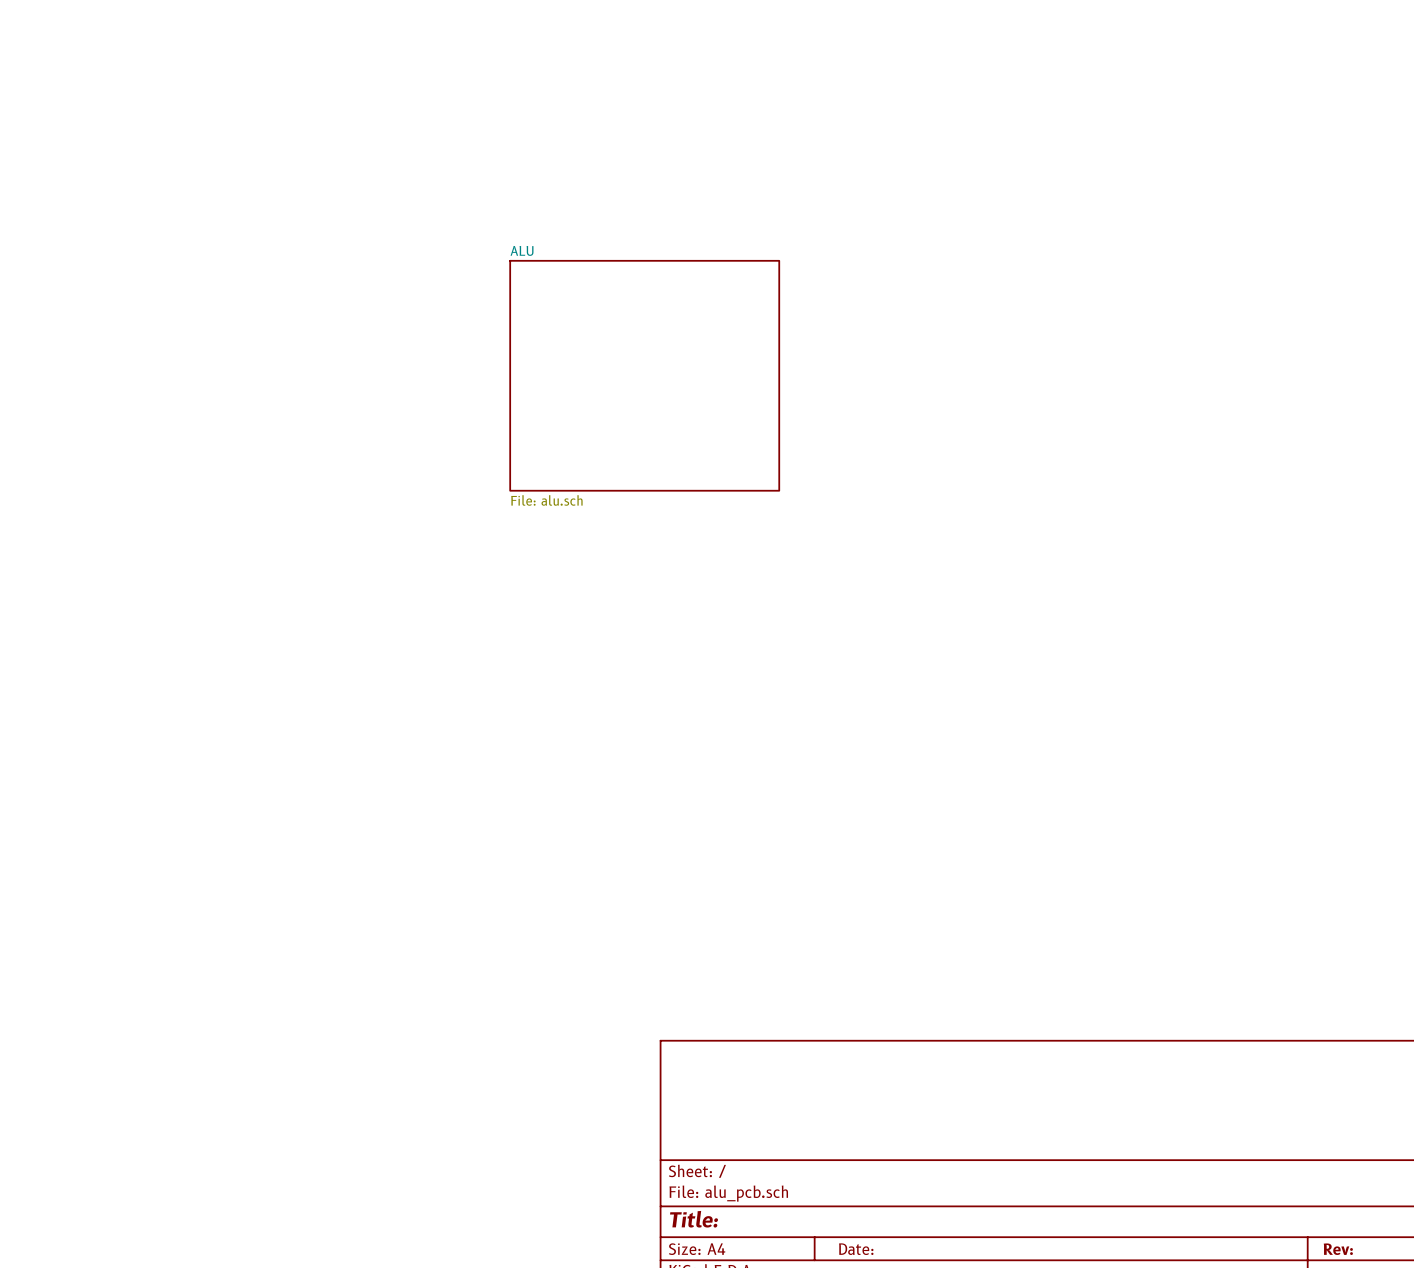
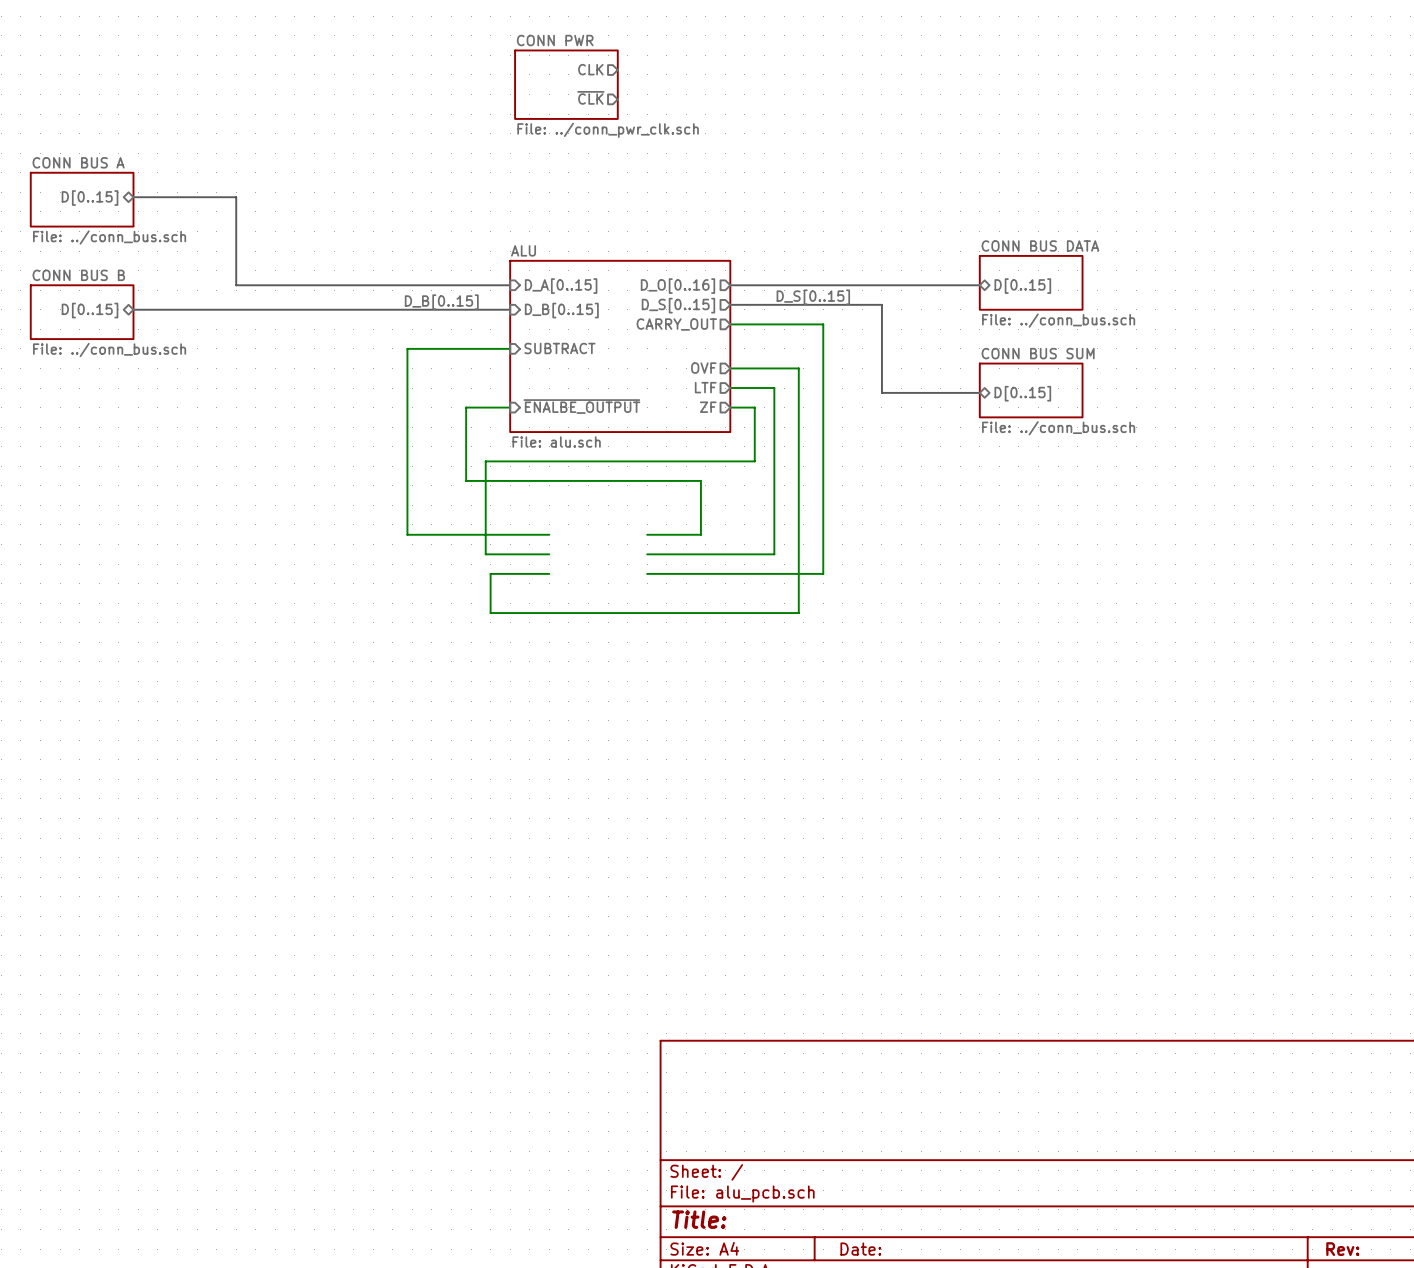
sheet pin: none -> CLK (590, 69)
sheet CONN PWR: none -> File: ../conn_pwr_clk.sch (566, 84)
sheet pin: none -> ~{CLK} (590, 97)
bus: none -> (133, 197) (236, 197) (236, 285) (510, 285)
sheet pin: none -> D[0..15] (90, 198)
sheet CONN BUS A: none -> File: ../conn_bus.sch (82, 199)
sheet CONN BUS DATA: none -> File: ../conn_bus.sch (1031, 282)
bus: none -> (730, 285) (979, 285)
sheet pin: none -> D_A[0..15] (561, 286)
sheet pin: none -> D_O[0..16] (677, 286)
sheet pin: none -> D[0..15] (1022, 286)
label: none -> D_S[0..15] (813, 297)
label: none -> D_B[0..15] (441, 302)
bus: none -> (730, 304) (881, 304) (881, 392) (979, 392)
sheet pin: none -> D_S[0..15] (678, 305)
bus: none -> (133, 309) (510, 309)
sheet pin: none -> D[0..15] (90, 310)
sheet pin: none -> D_B[0..15] (561, 310)
sheet CONN BUS B: none -> File: ../conn_bus.sch (82, 312)
wire: none -> (730, 324) (823, 324) (823, 573) (647, 573)
sheet pin: none -> CARRY_OUT (676, 324)
sheet ALU: none -> File: alu.sch (620, 346)
wire: none -> (510, 348) (407, 348) (407, 534) (549, 534)
sheet pin: none -> SUBTRACT (559, 348)
sheet pin: none -> OVF (703, 368)
wire: none -> (730, 368) (798, 368) (798, 613) (490, 613) (490, 573) (549, 573)
sheet ALU: File: alu.sch (644, 375) -> none
sheet pin: none -> LTF (705, 387)
wire: none -> (730, 388) (774, 388) (774, 554) (647, 554)
sheet CONN BUS SUM: none -> File: ../conn_bus.sch (1031, 390)
sheet pin: none -> D[0..15] (1022, 393)
wire: none -> (510, 407) (466, 407) (466, 480) (700, 480) (700, 534) (647, 534)
sheet pin: none -> ~{ENALBE_OUTPUT} (581, 406)
sheet pin: none -> ZF (708, 407)
wire: none -> (730, 407) (754, 407) (754, 461) (485, 461) (485, 554) (549, 554)

